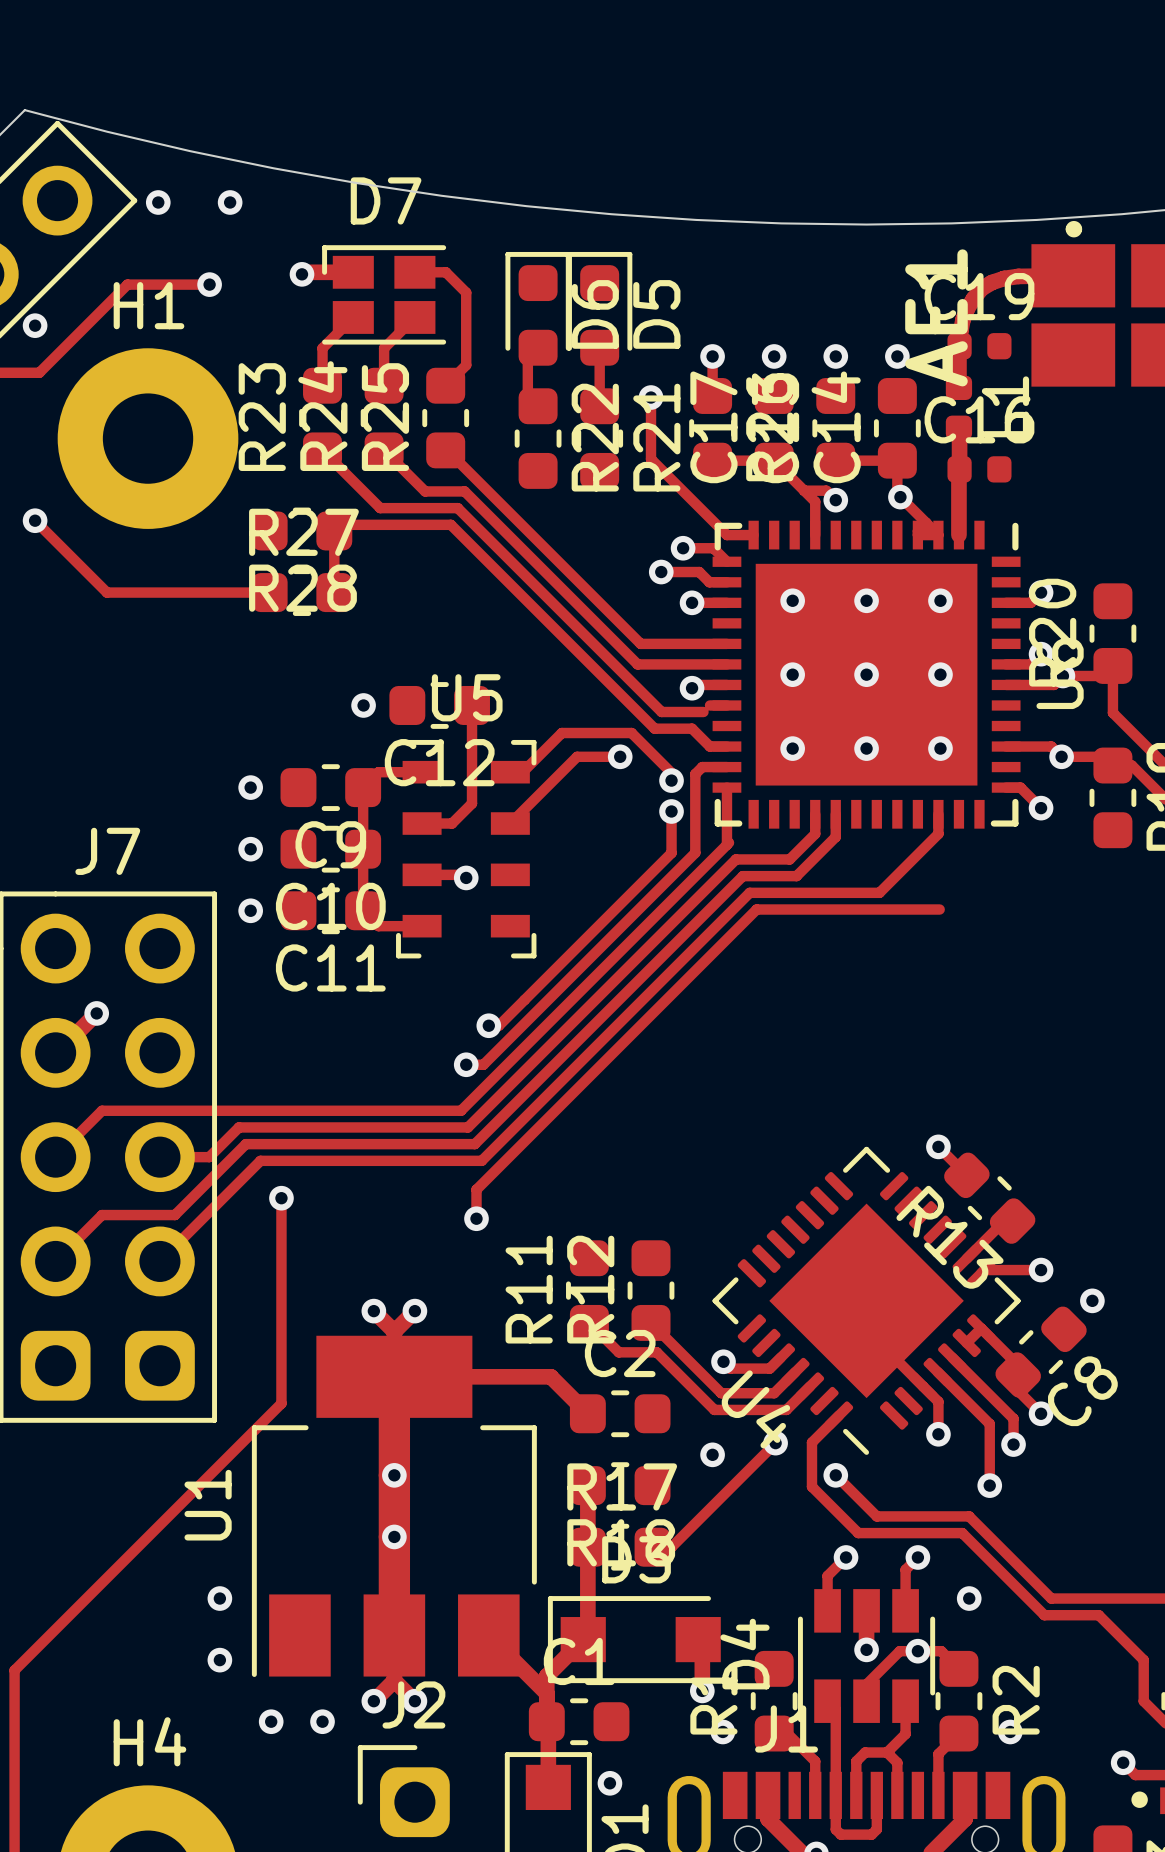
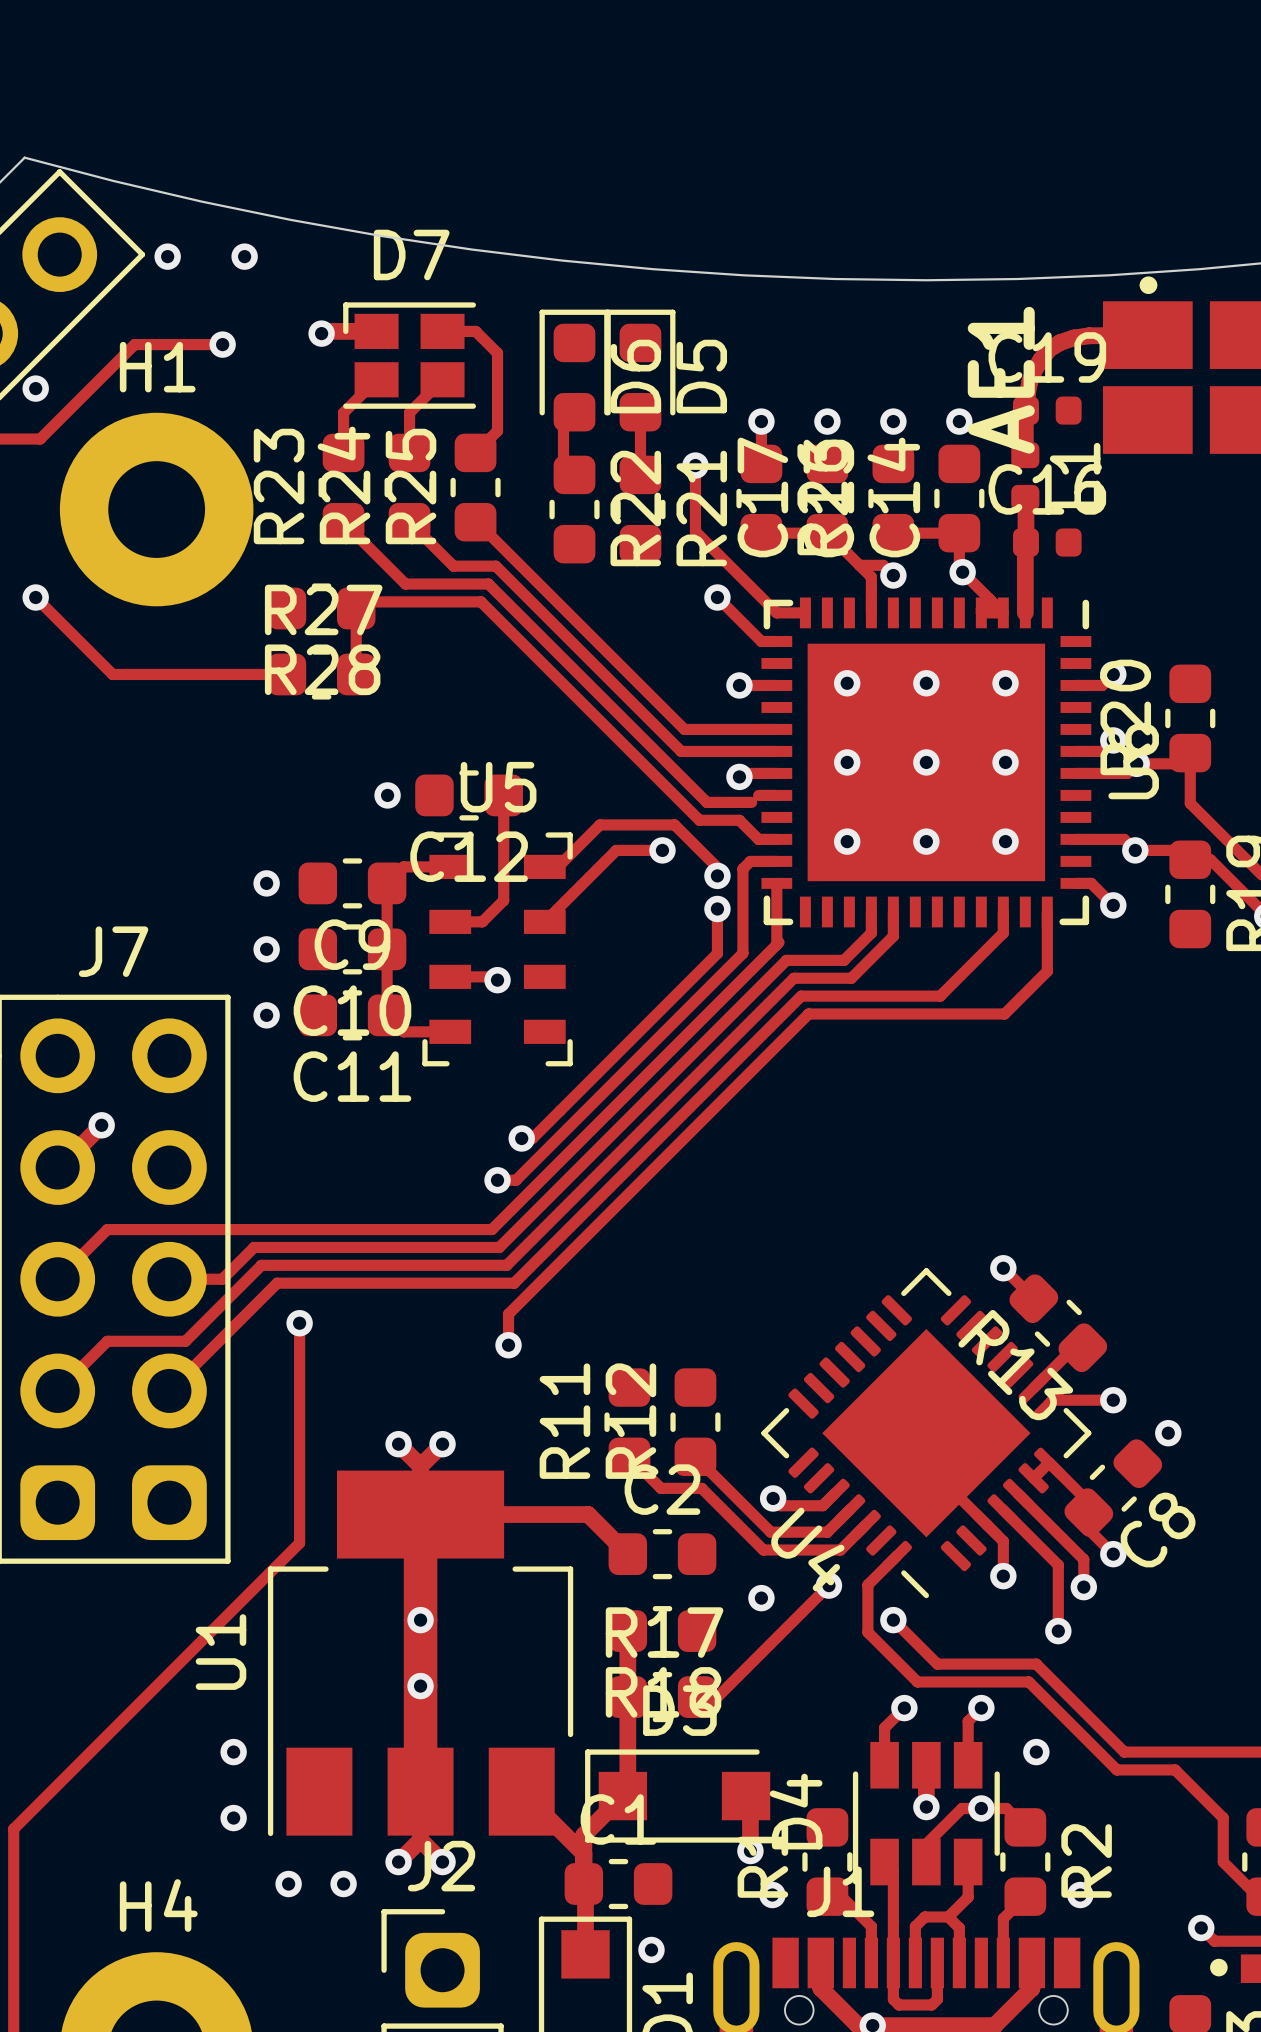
via: none -> (717, 597)
track: (683, 548) (713, 548) (726, 561) -> (717, 597) (761, 641) (776, 641)
via: (683, 548) -> none
track: (661, 572) (699, 572) (709, 582) (726, 582) -> none
via: (661, 572) -> none
track: none -> (1047, 911) (1047, 971) (1004, 1013)

